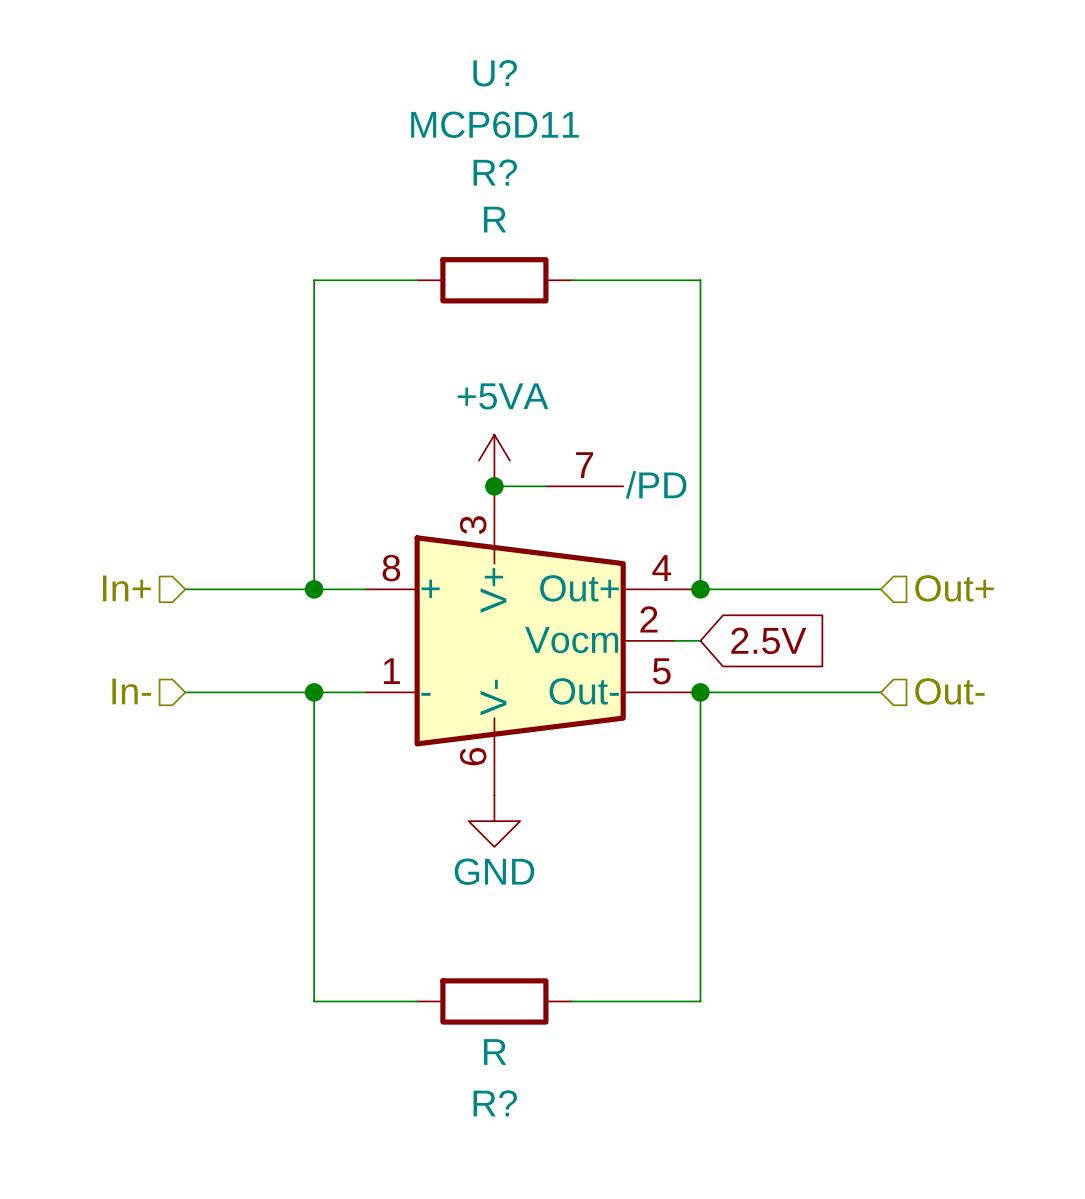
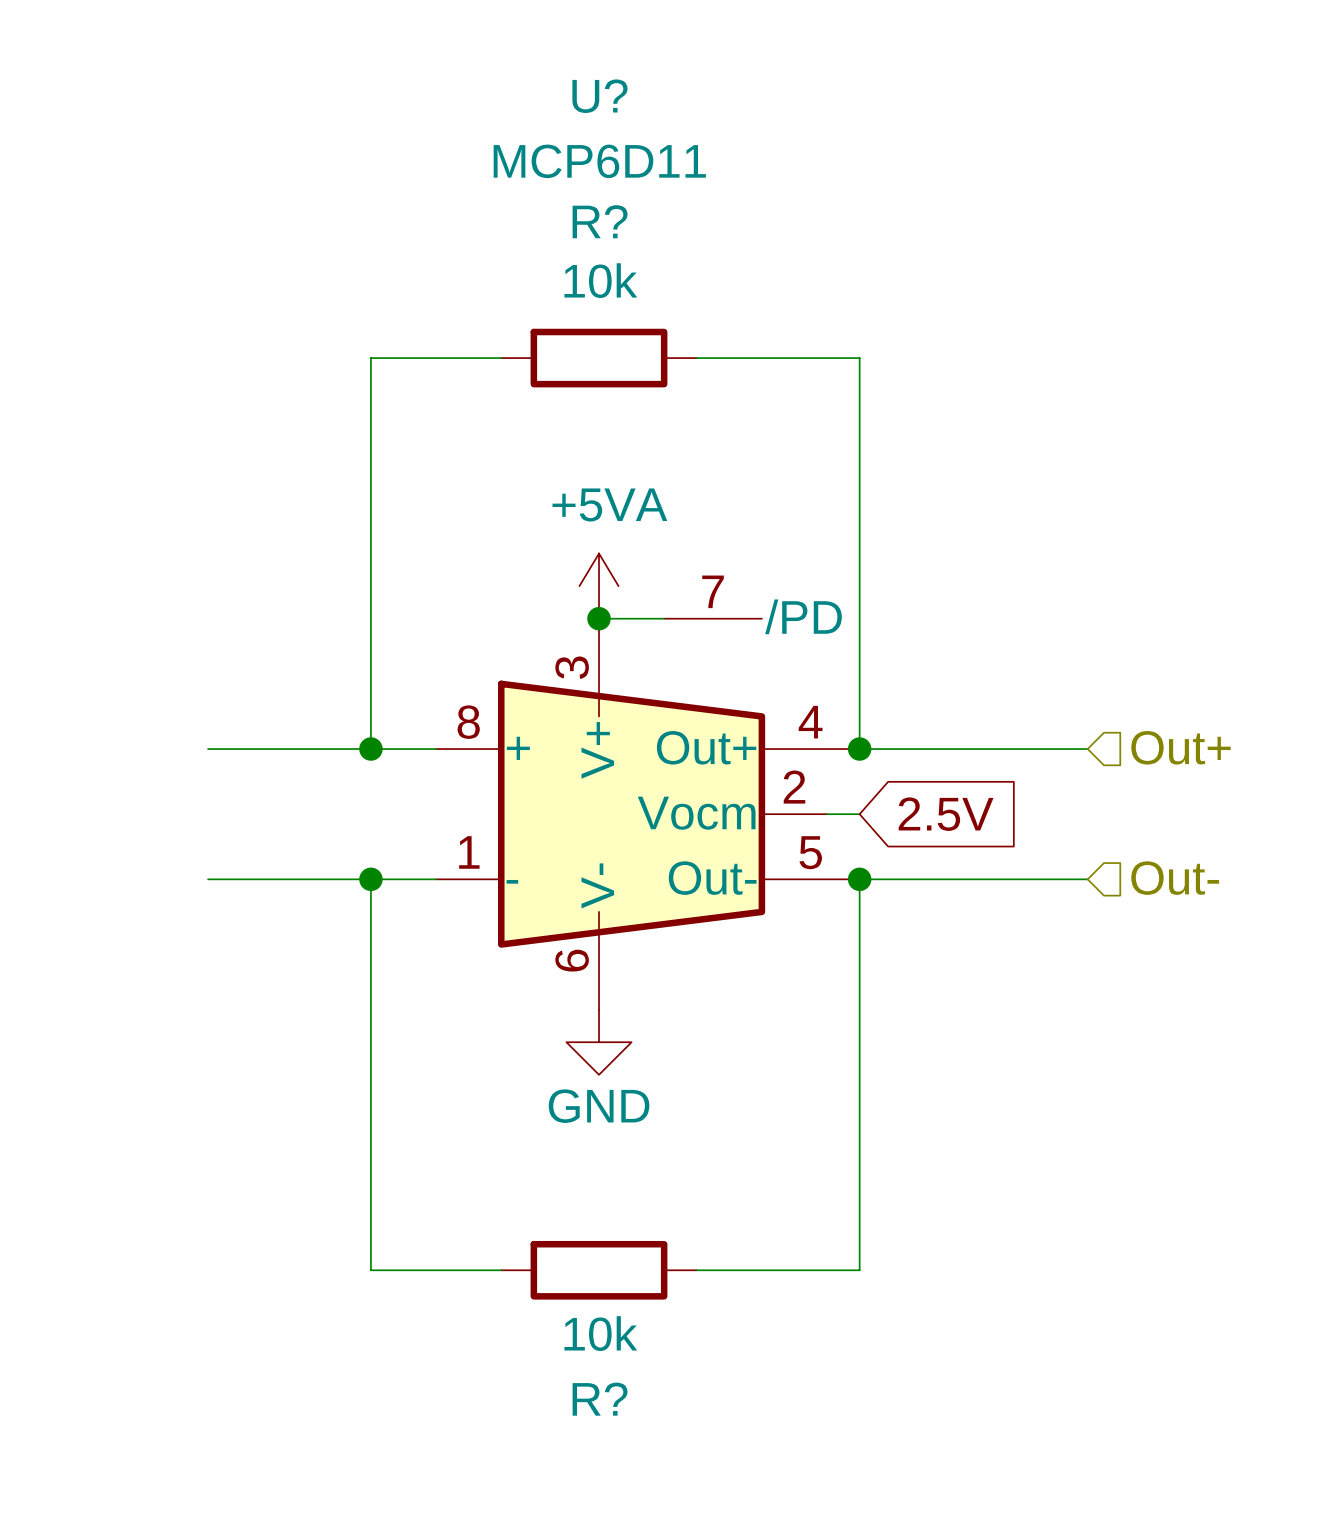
R? value: R (495, 219) -> 10k (600, 280)
hierarchical label: In+ (126, 588) -> none
hierarchical label: In- (131, 691) -> none
R? value: R (495, 1052) -> 10k (600, 1333)

